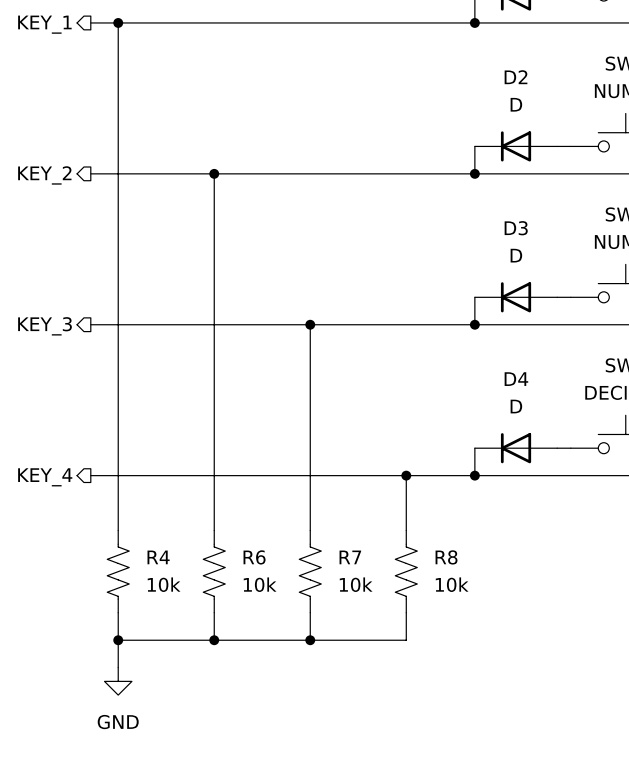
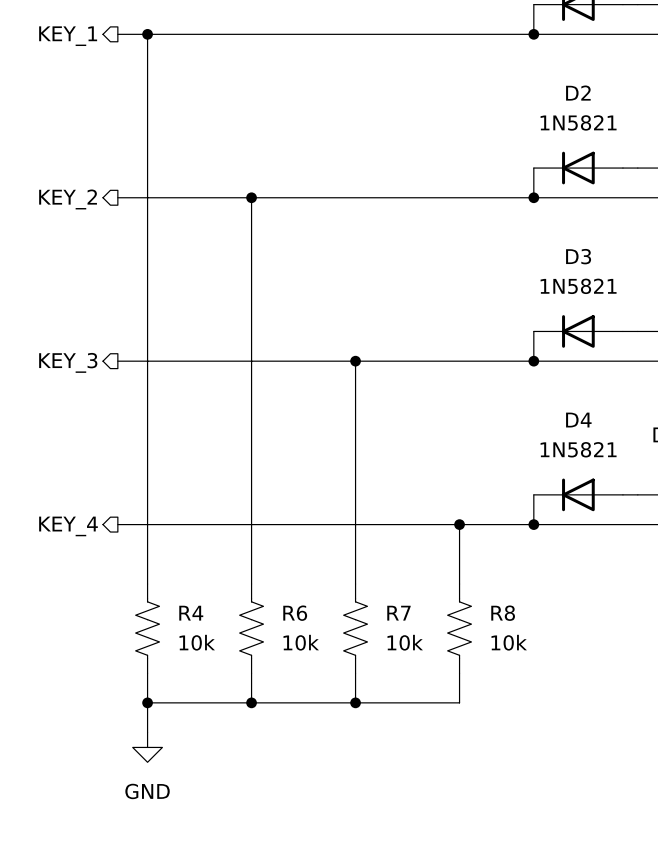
D2 value: D (516, 104) -> 1N5821 (578, 122)
D3 value: D (516, 255) -> 1N5821 (578, 286)
D4 value: D (516, 406) -> 1N5821 (578, 449)

